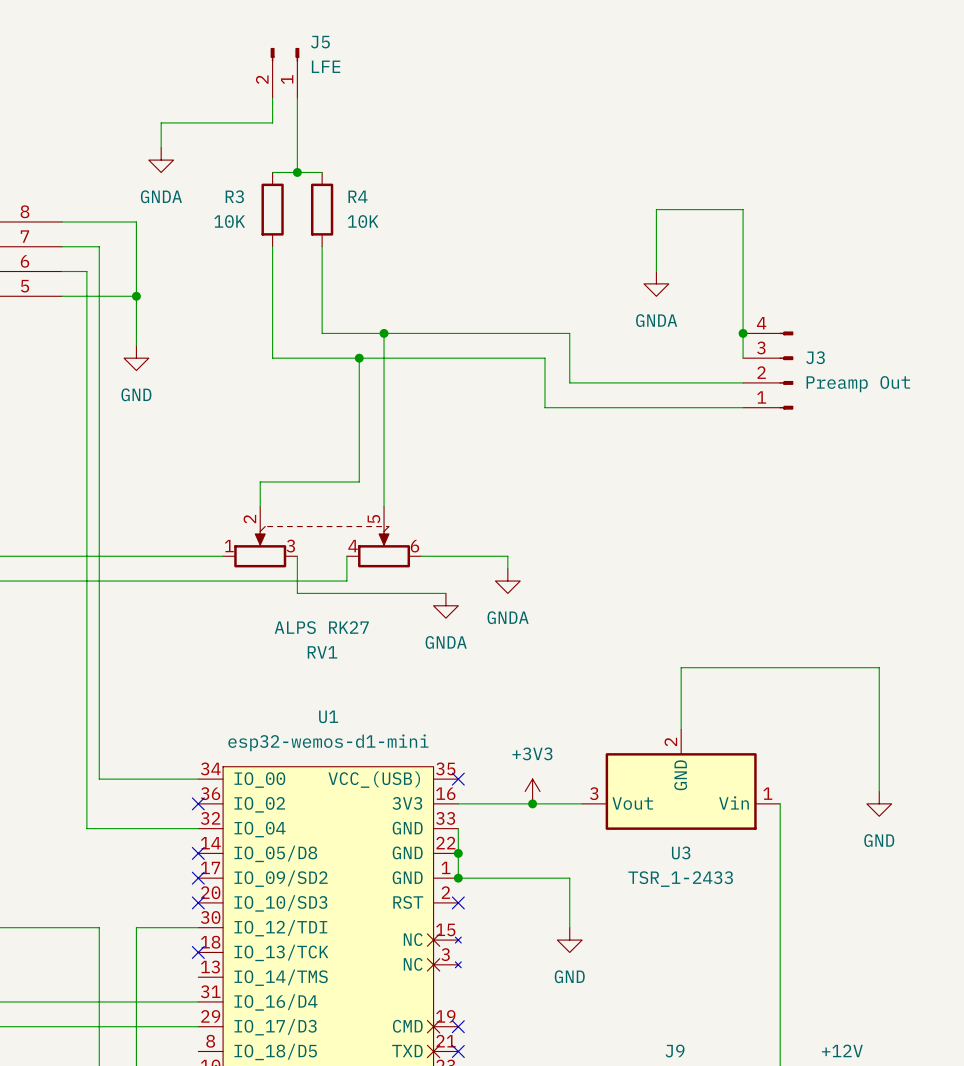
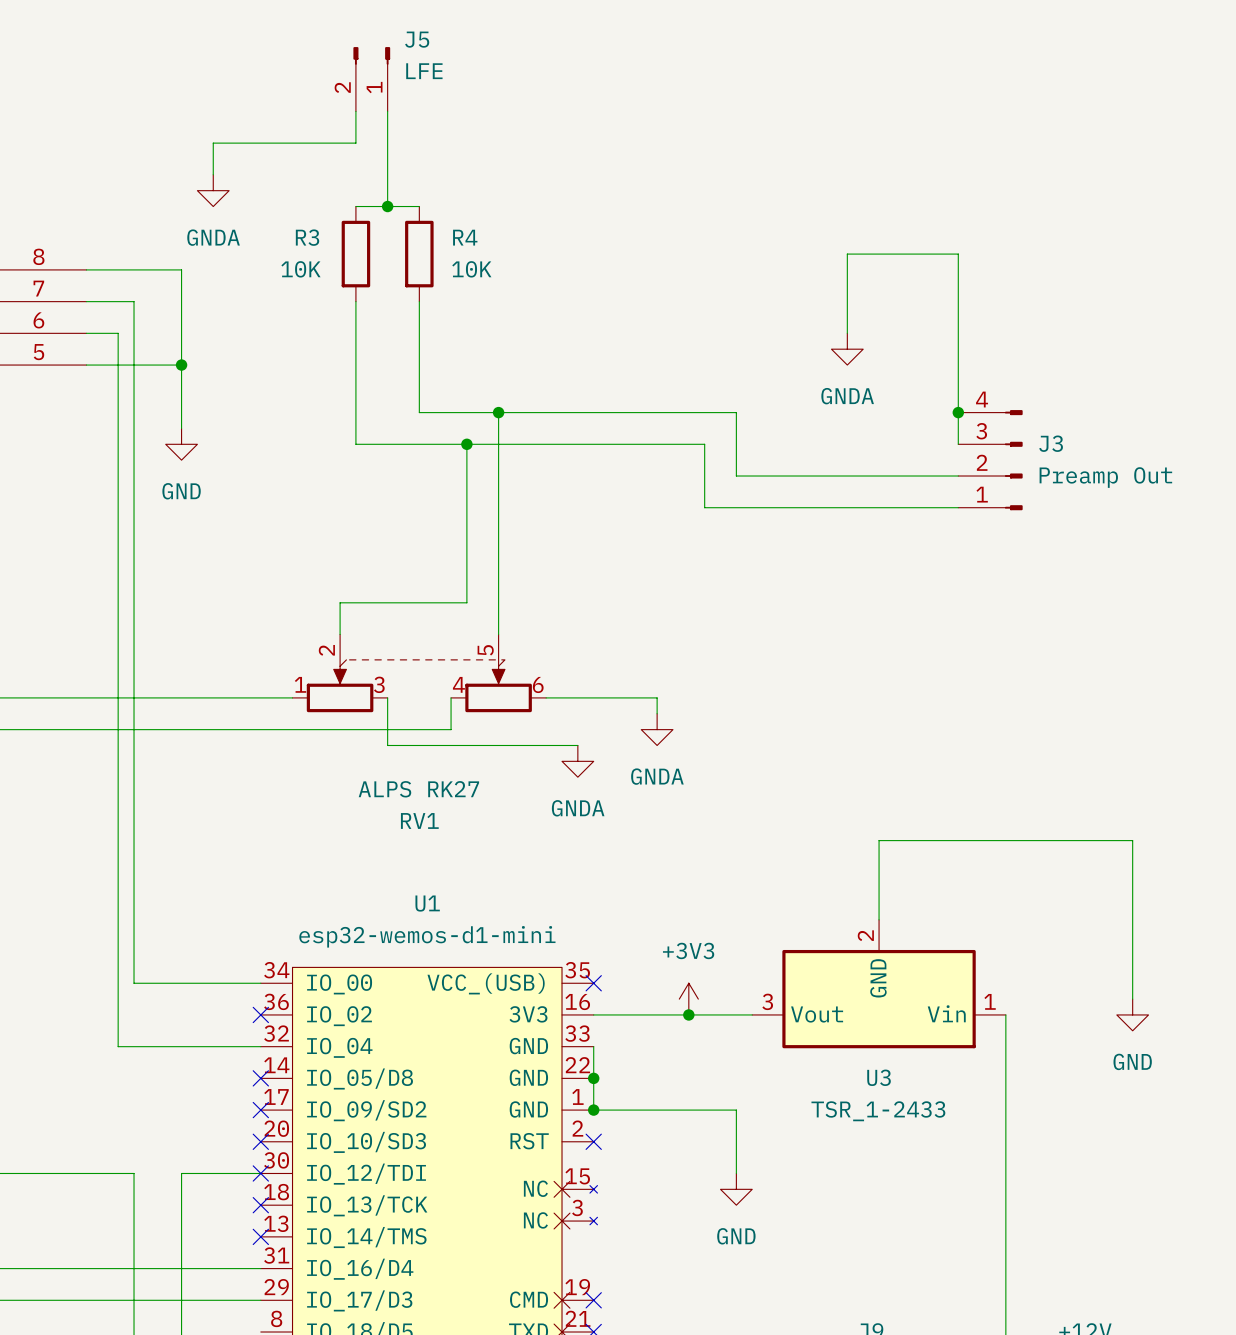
no-connect mark: none -> (260, 1173)
no-connect mark: none -> (260, 1236)

